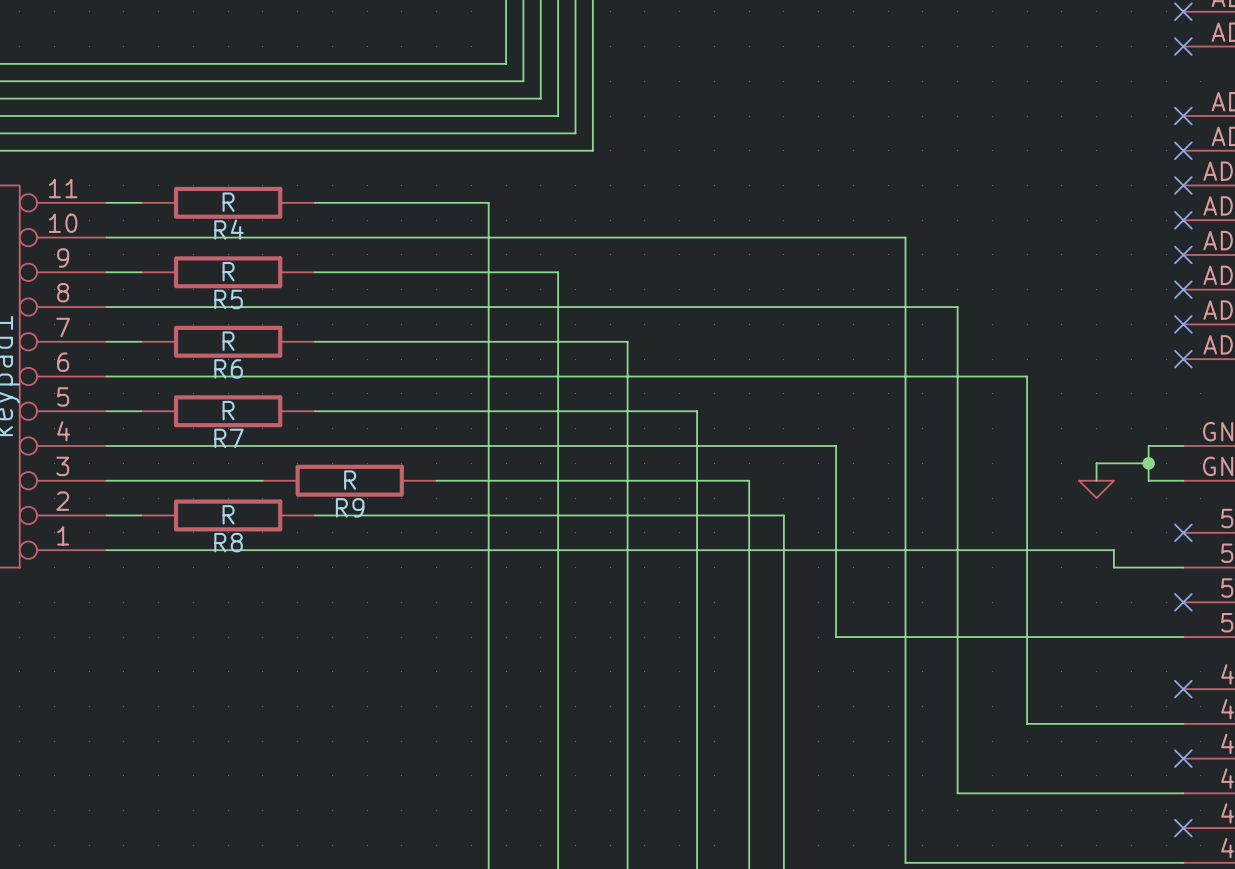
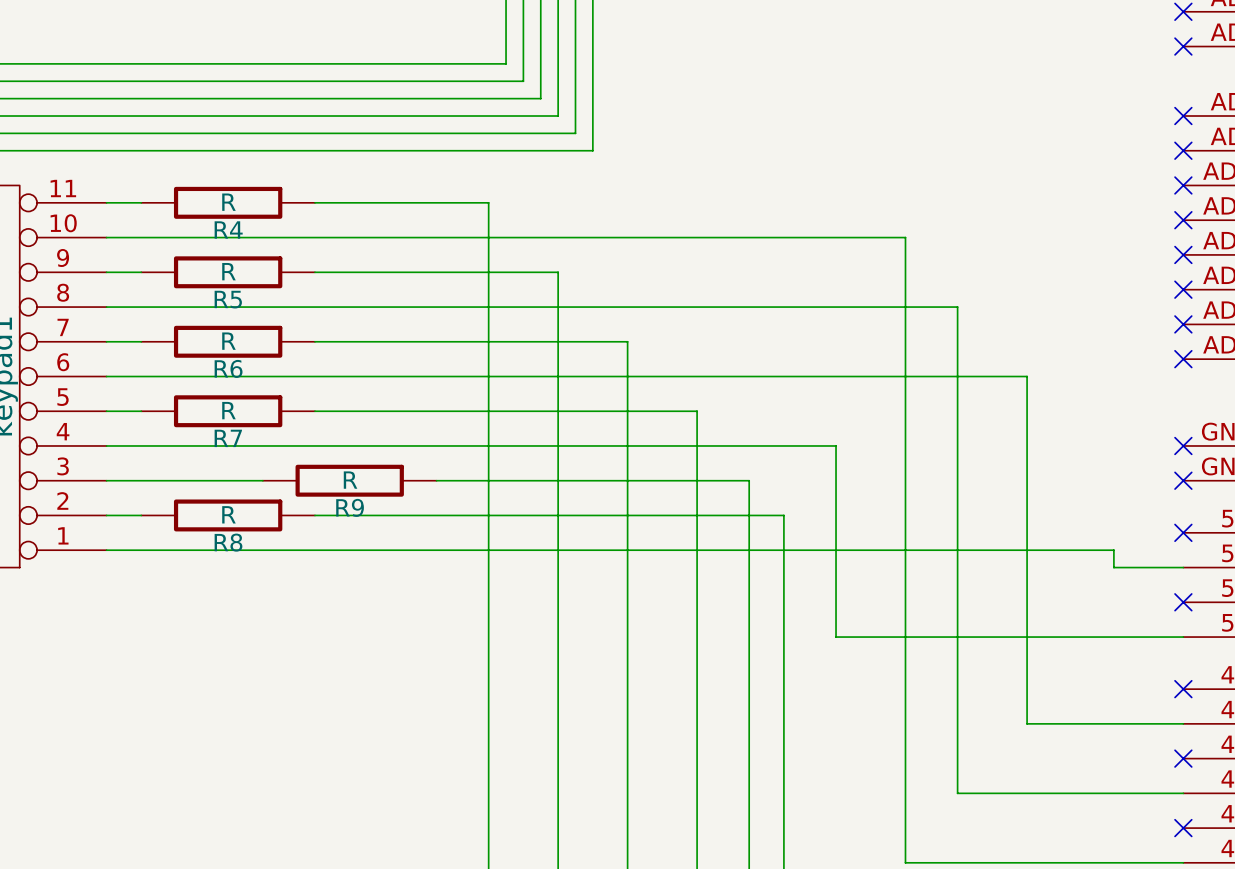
wire: (1183, 445) (1148, 445) (1148, 480) (1183, 480) -> none
no-connect mark: none -> (1183, 445)
wire: (1148, 463) (1096, 463) (1096, 480) -> none
junction: (1148, 463) -> none
no-connect mark: none -> (1183, 480)
power symbol: (1096, 489) -> none

